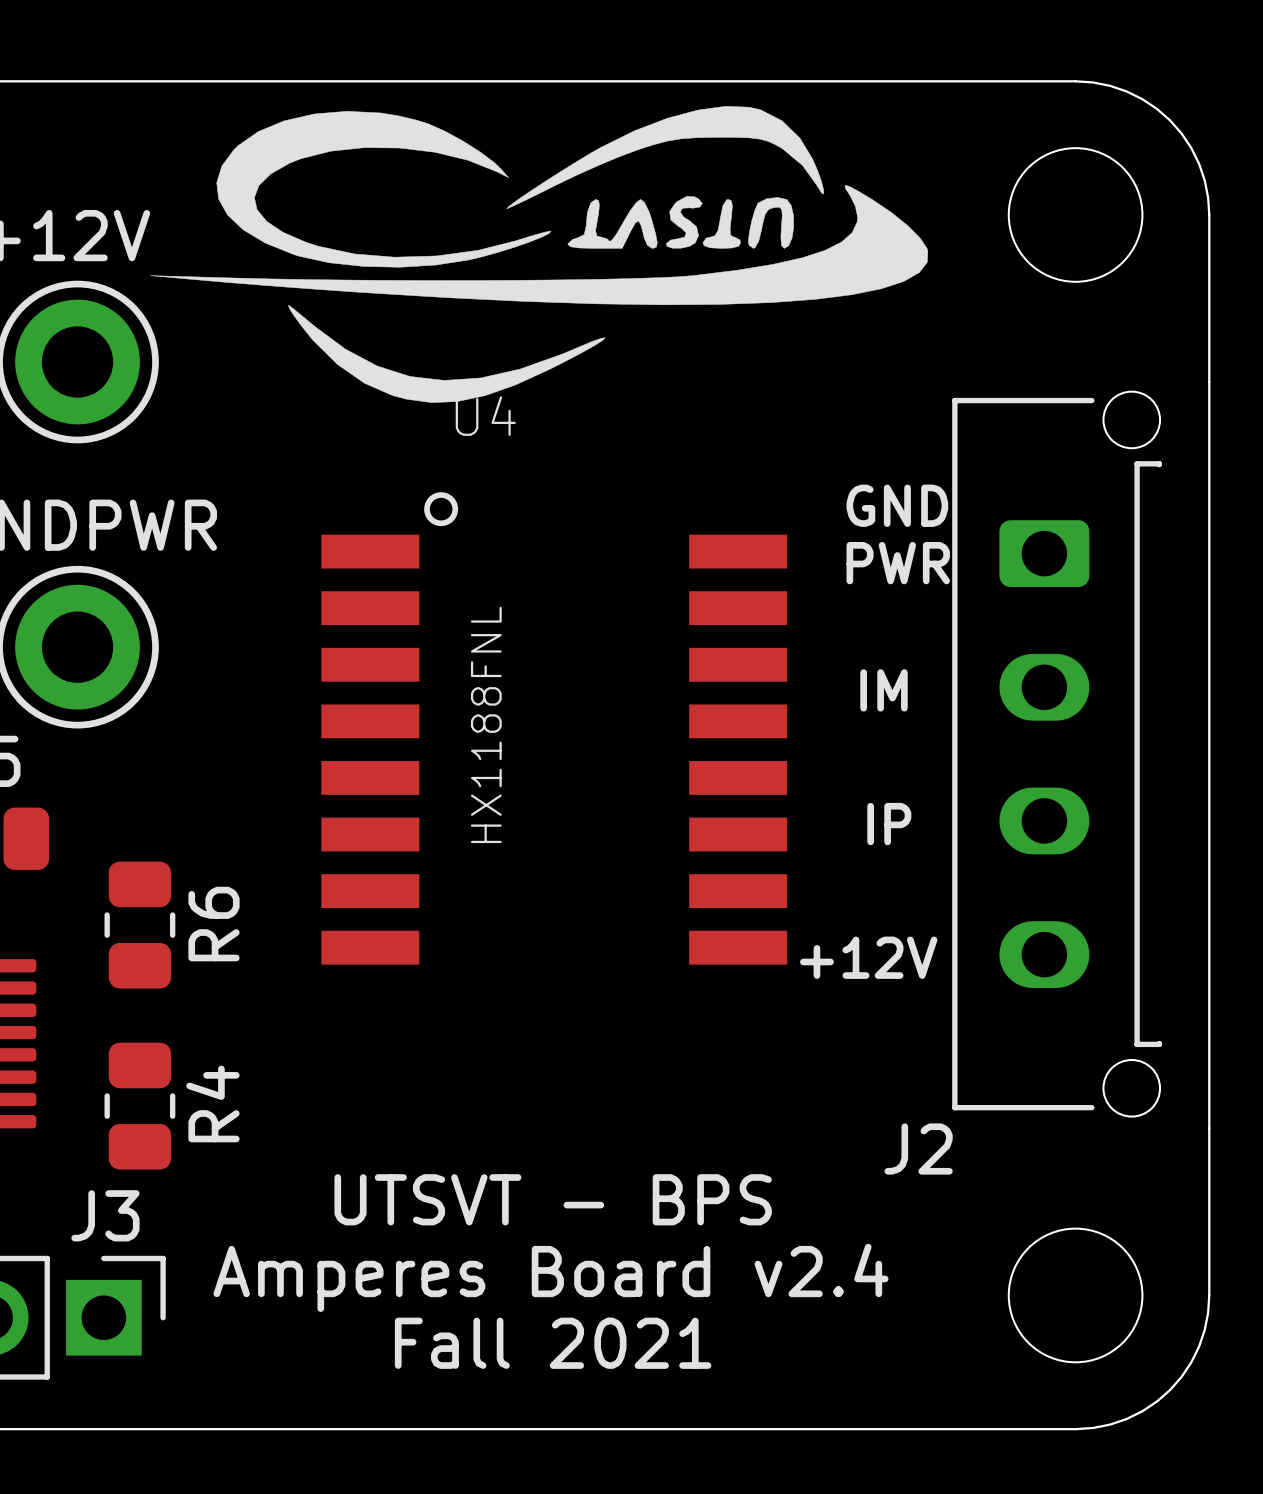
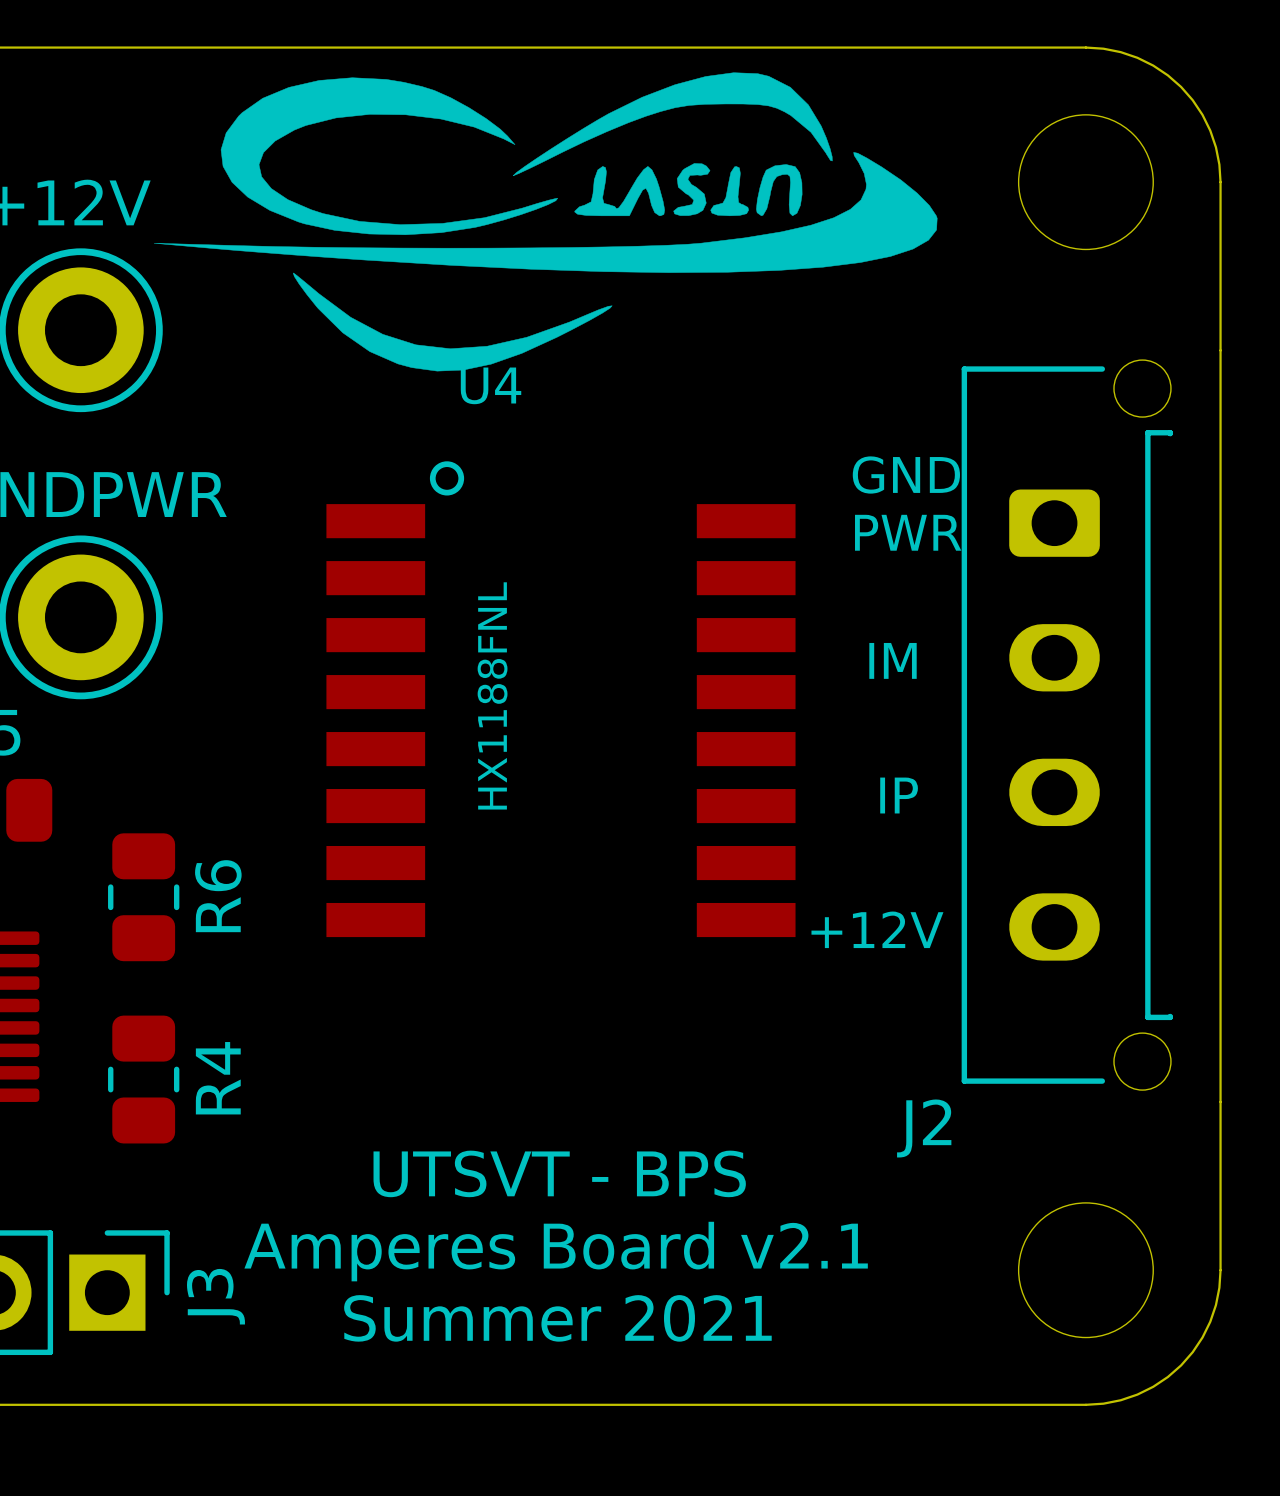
J3 name rotation: 0° (105, 1215) -> 90° counterclockwise (215, 1296)
J3 name position: J3 (105, 1215) -> J3 (215, 1296)
text: Amperes Board v2.4 (551, 1277) -> Amperes Board v2.1 (556, 1251)
text: Fall 2021 (553, 1343) -> Summer 2021 (557, 1318)

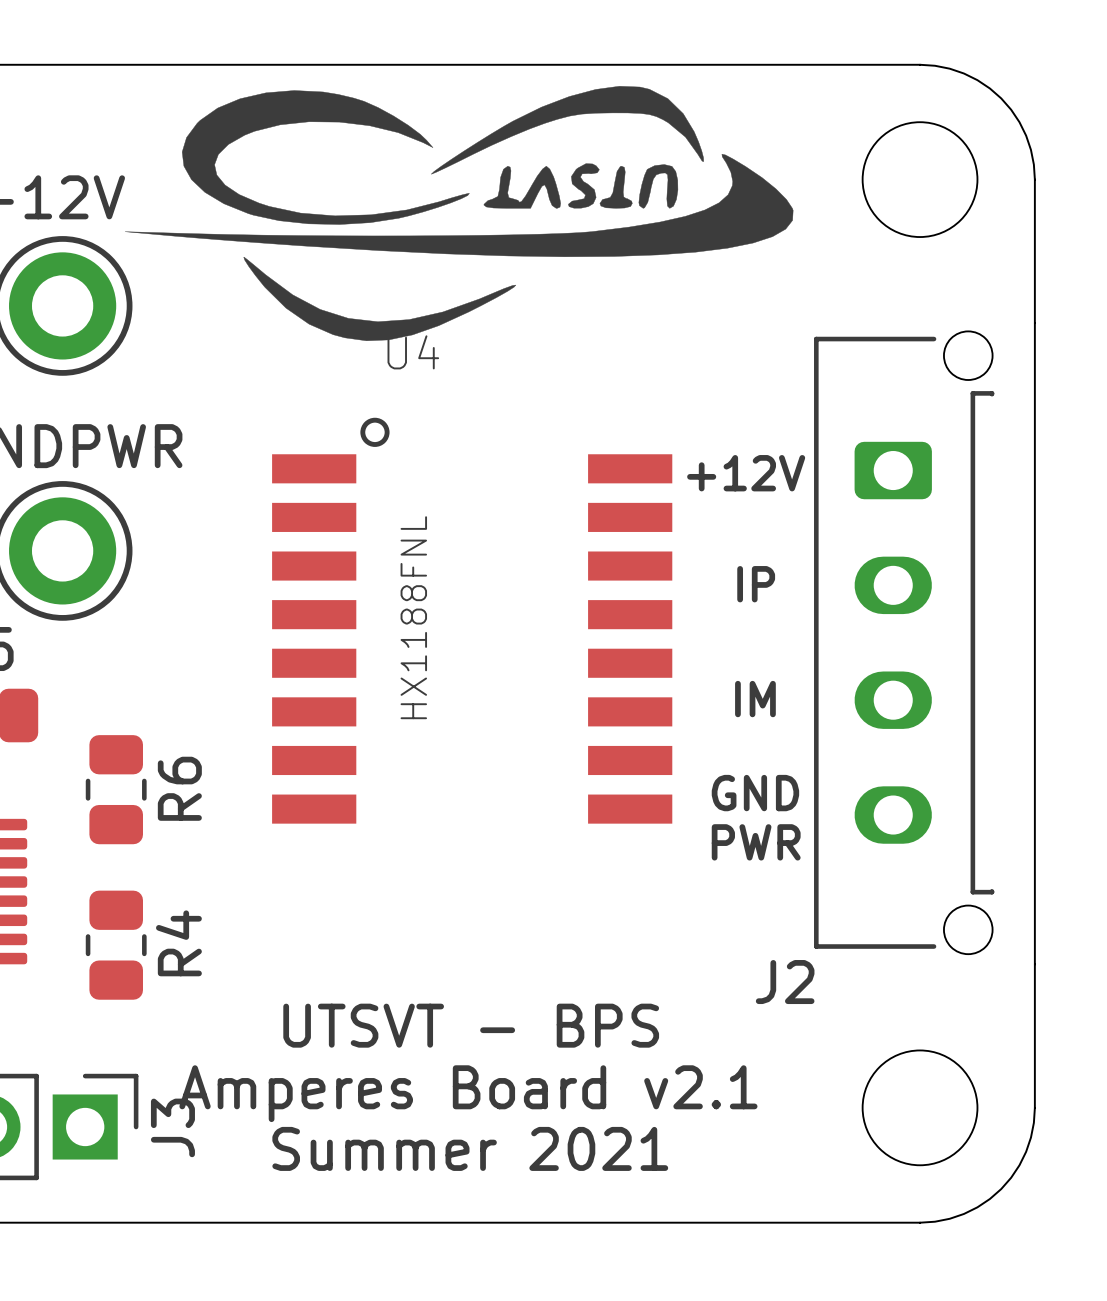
text position: GND (906, 475) -> GND (755, 793)
text: PWR (908, 532) -> +12V (746, 473)
text: IM (893, 660) -> IP (756, 584)
text: IP (899, 795) -> IM (755, 699)
text: +12V (877, 929) -> none
text: none -> PWR (756, 842)

